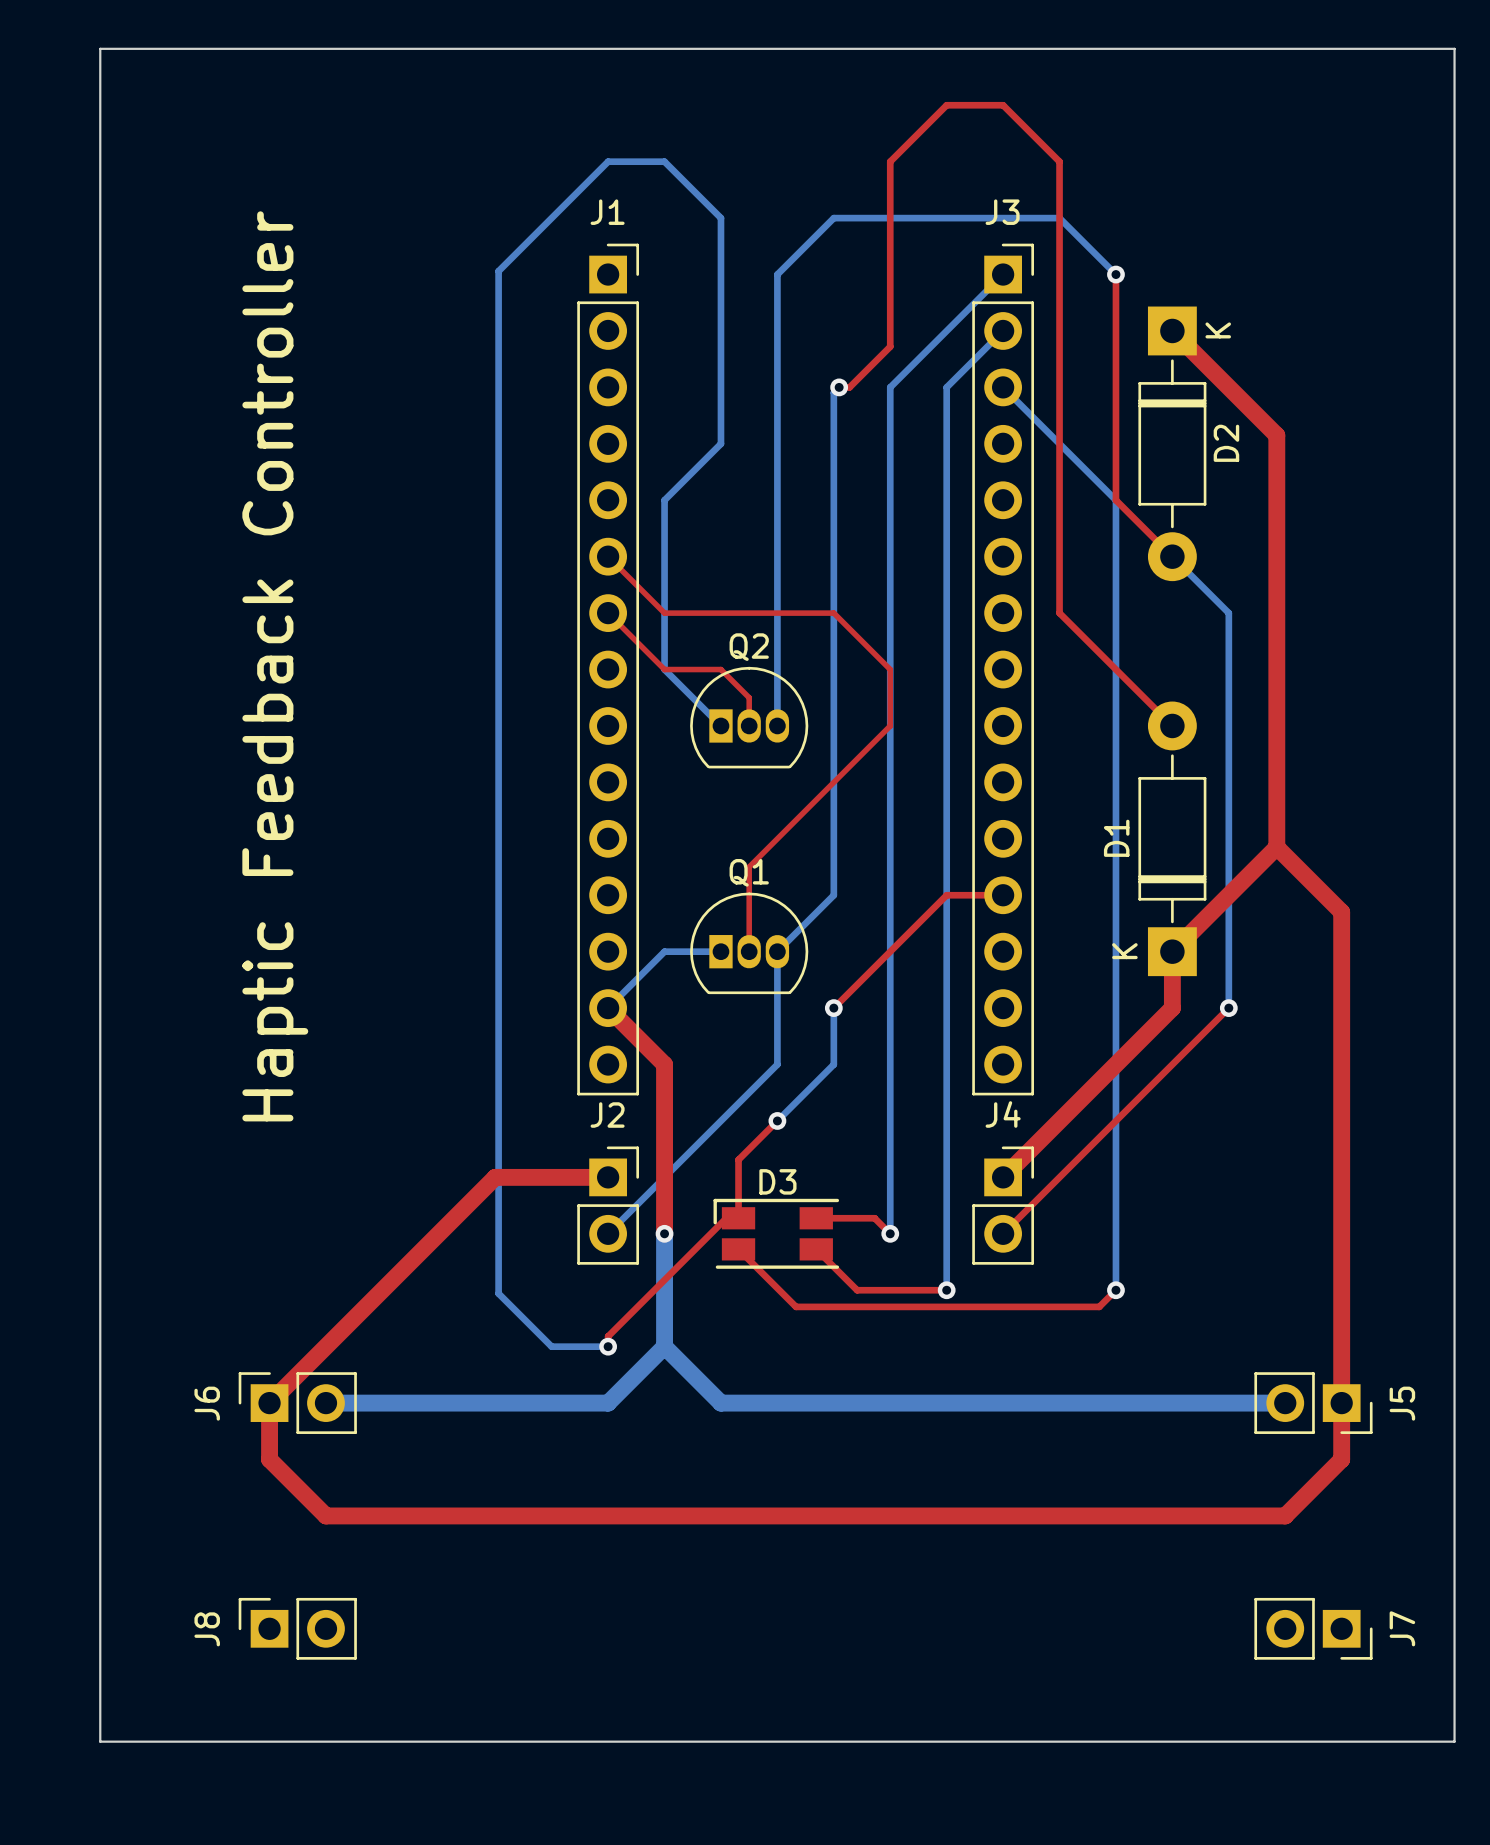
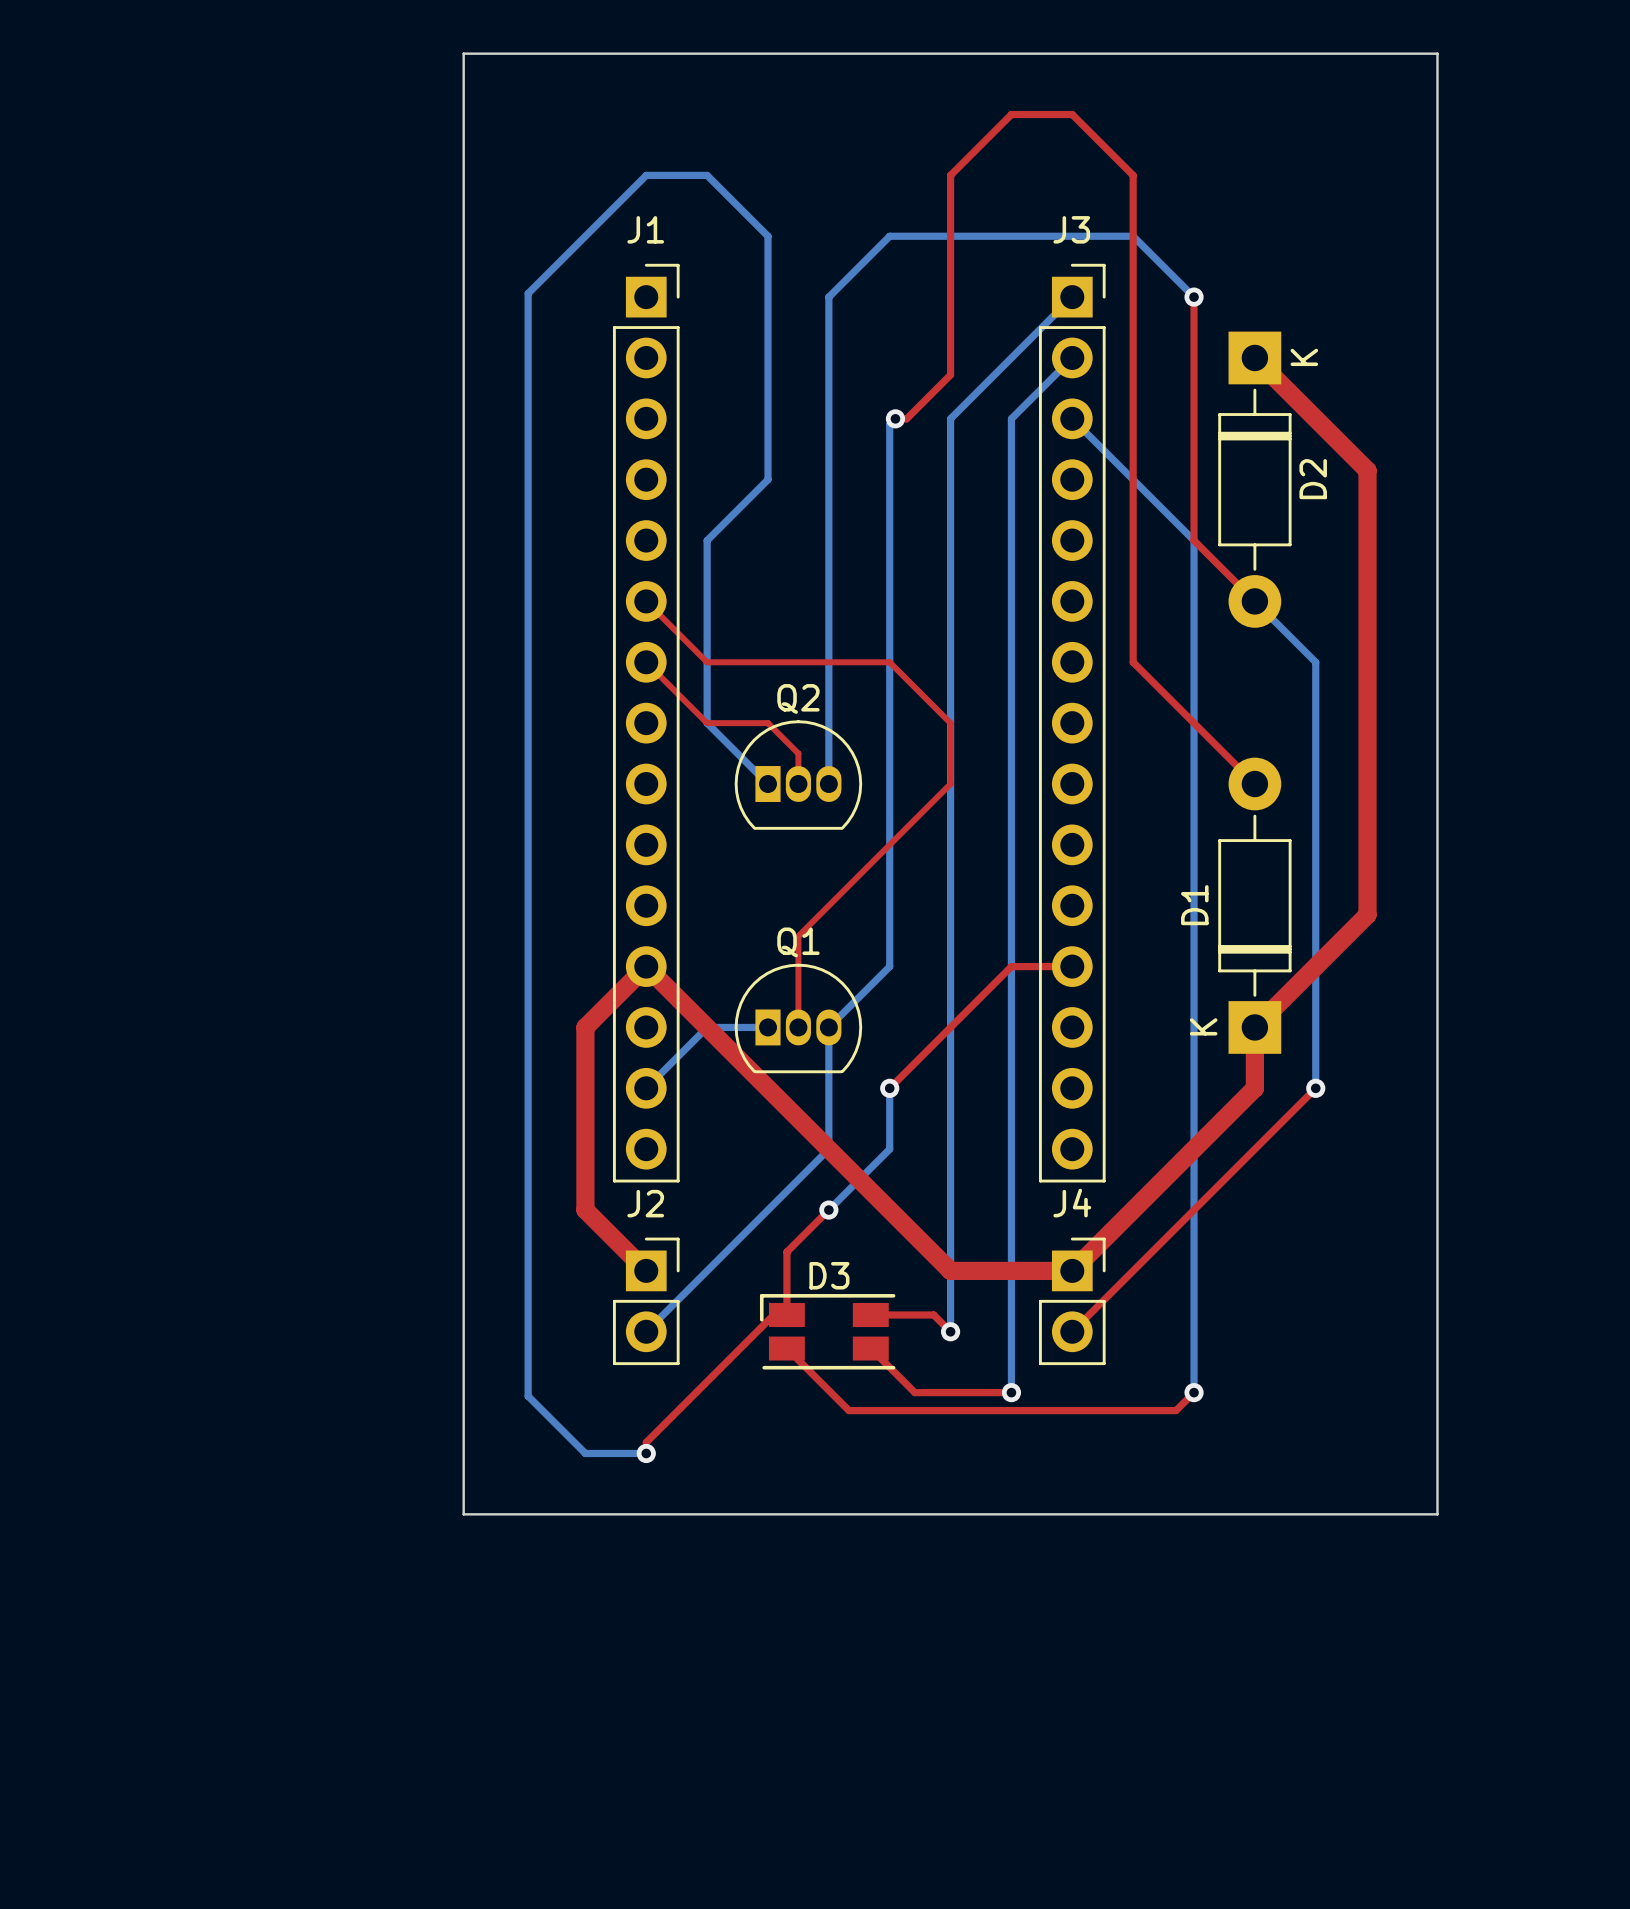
board edge: (438, 48) (100, 48) (100, 1741) (1454, 1741) (1454, 48) (1341, 48) -> (463, 53) (463, 1514) (1437, 1514) (1437, 53)
text: Haptic Feedback Controller (275, 666) -> none
top track: (1276, 847) (1341, 912) (1341, 1459) (1285, 1515) (325, 1515) (269, 1459) (269, 1403) (495, 1177) (608, 1177) -> (1072, 1270) (950, 1270) (646, 966) (585, 1027) (585, 1210) (646, 1270)
top track: (608, 1008) (664, 1064) (664, 1233) -> none
bottom track: (664, 1233) (664, 1346) -> none
via: (664, 1233) -> none
bottom track: (664, 1346) (608, 1403) (325, 1403) -> none
bottom track: (664, 1346) (720, 1403) (1285, 1403) -> none
J6: (297, 1403) -> none
J5: (1313, 1403) -> none
J8: (297, 1628) -> none
J7: (1313, 1628) -> none

